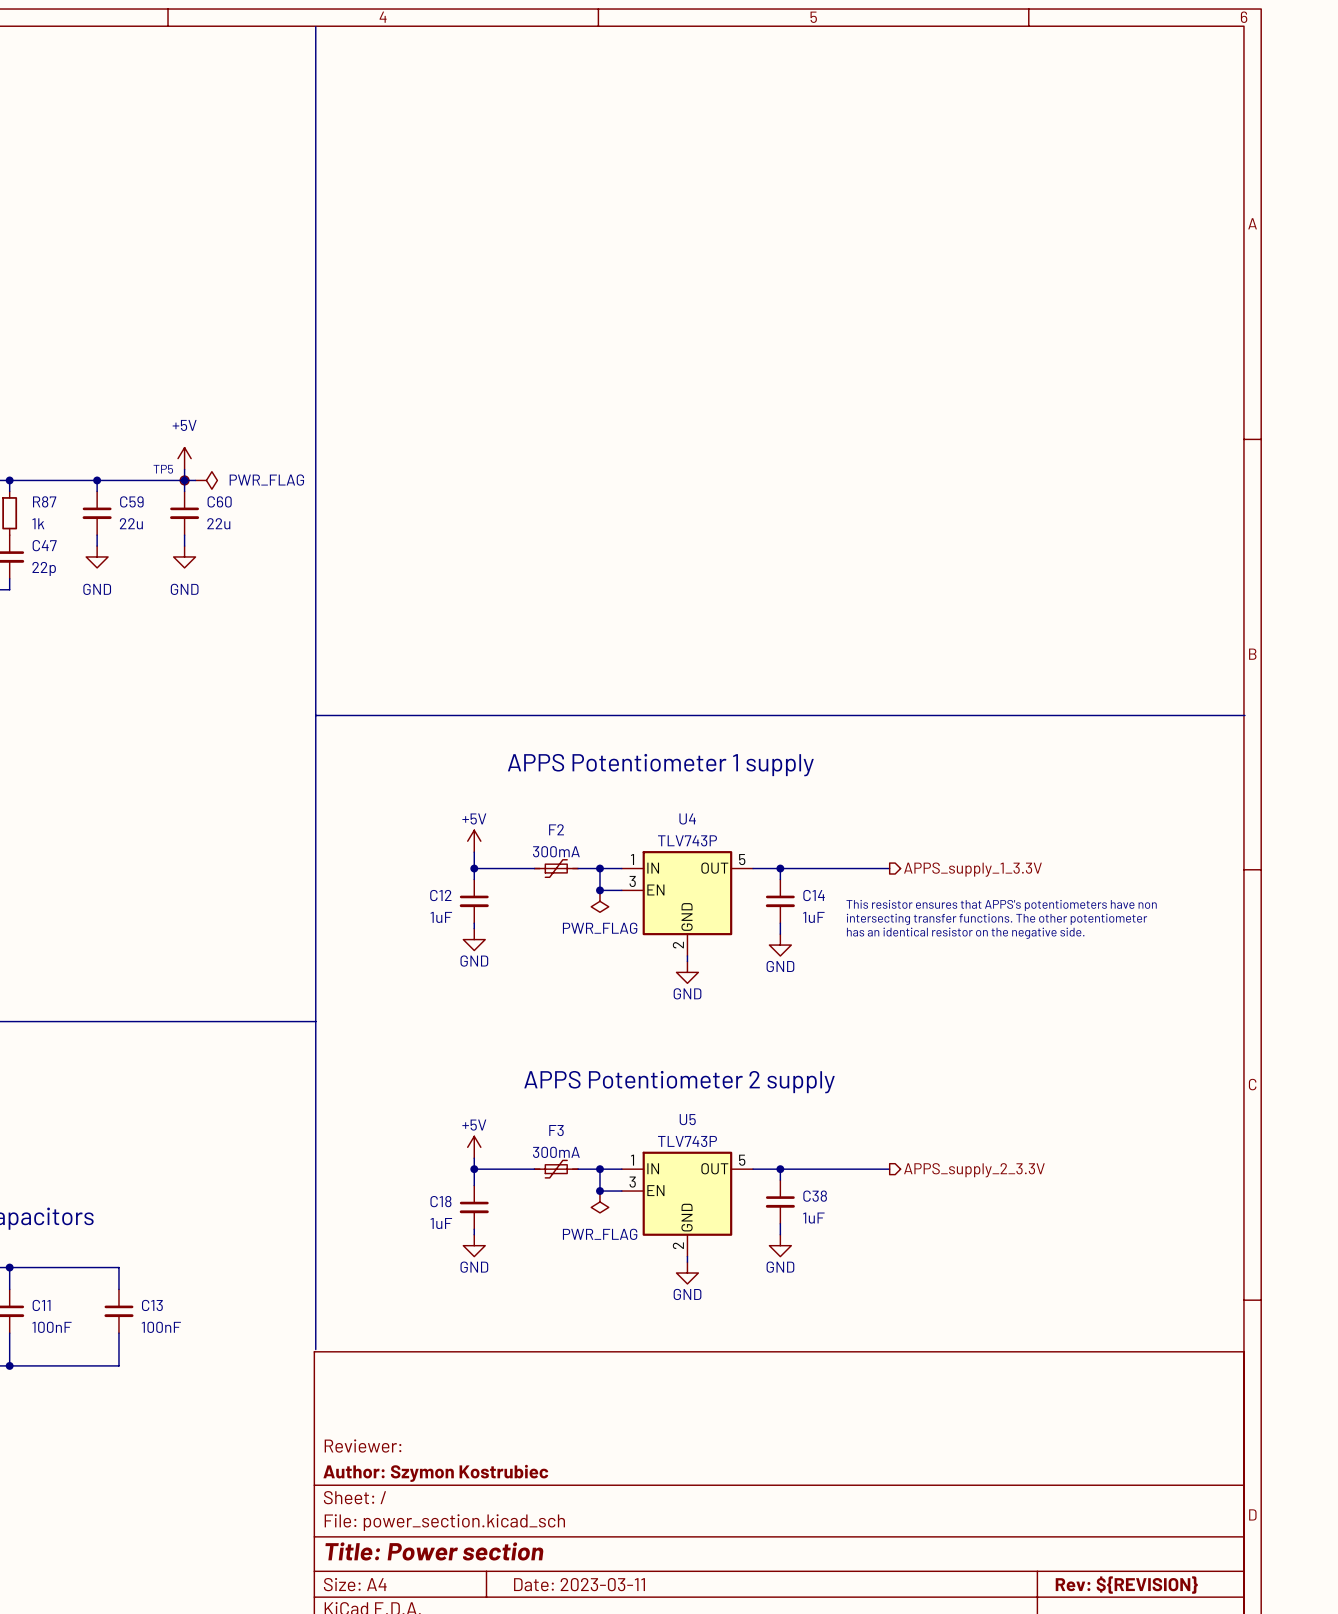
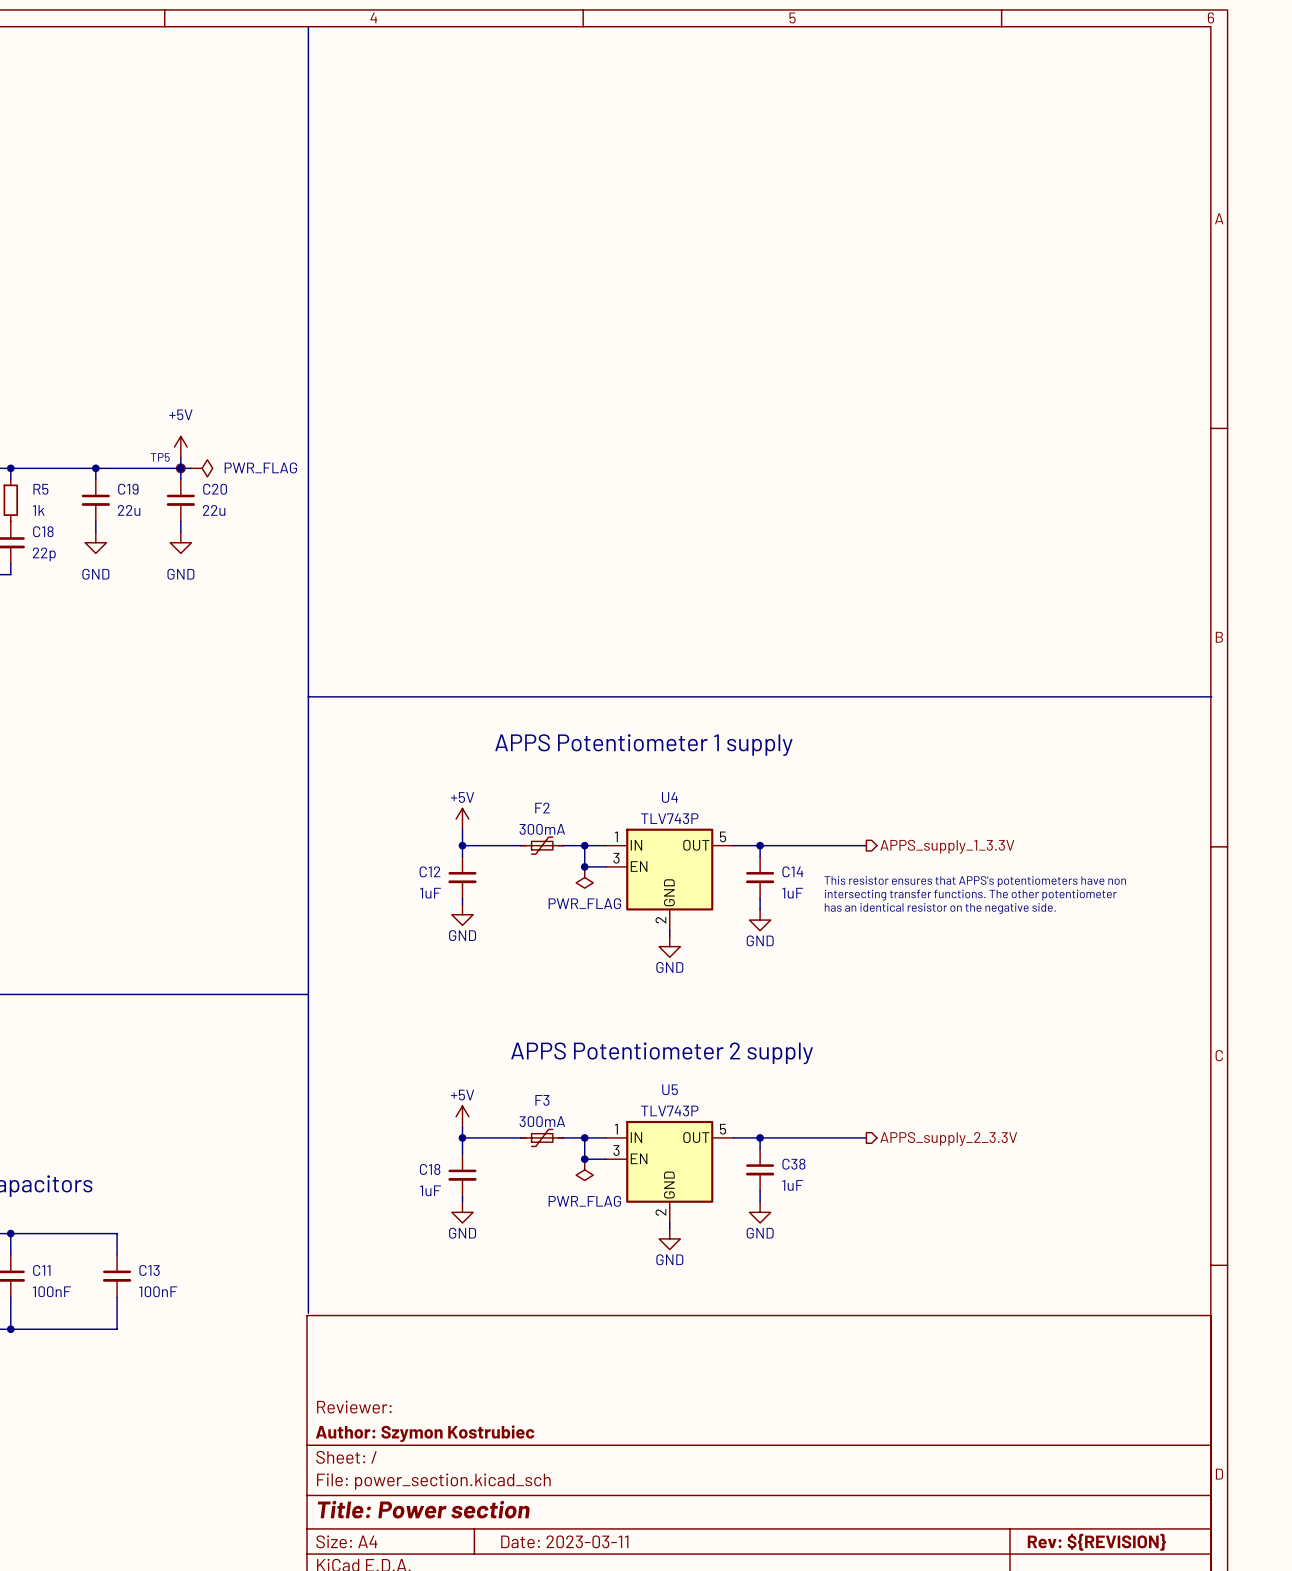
R87 name: R87 (44, 501) -> R5 (40, 489)
C59 name: C59 (131, 501) -> C19 (128, 489)
C60 name: C60 (219, 501) -> C20 (215, 489)
C47 name: C47 (44, 545) -> C18 (43, 531)

